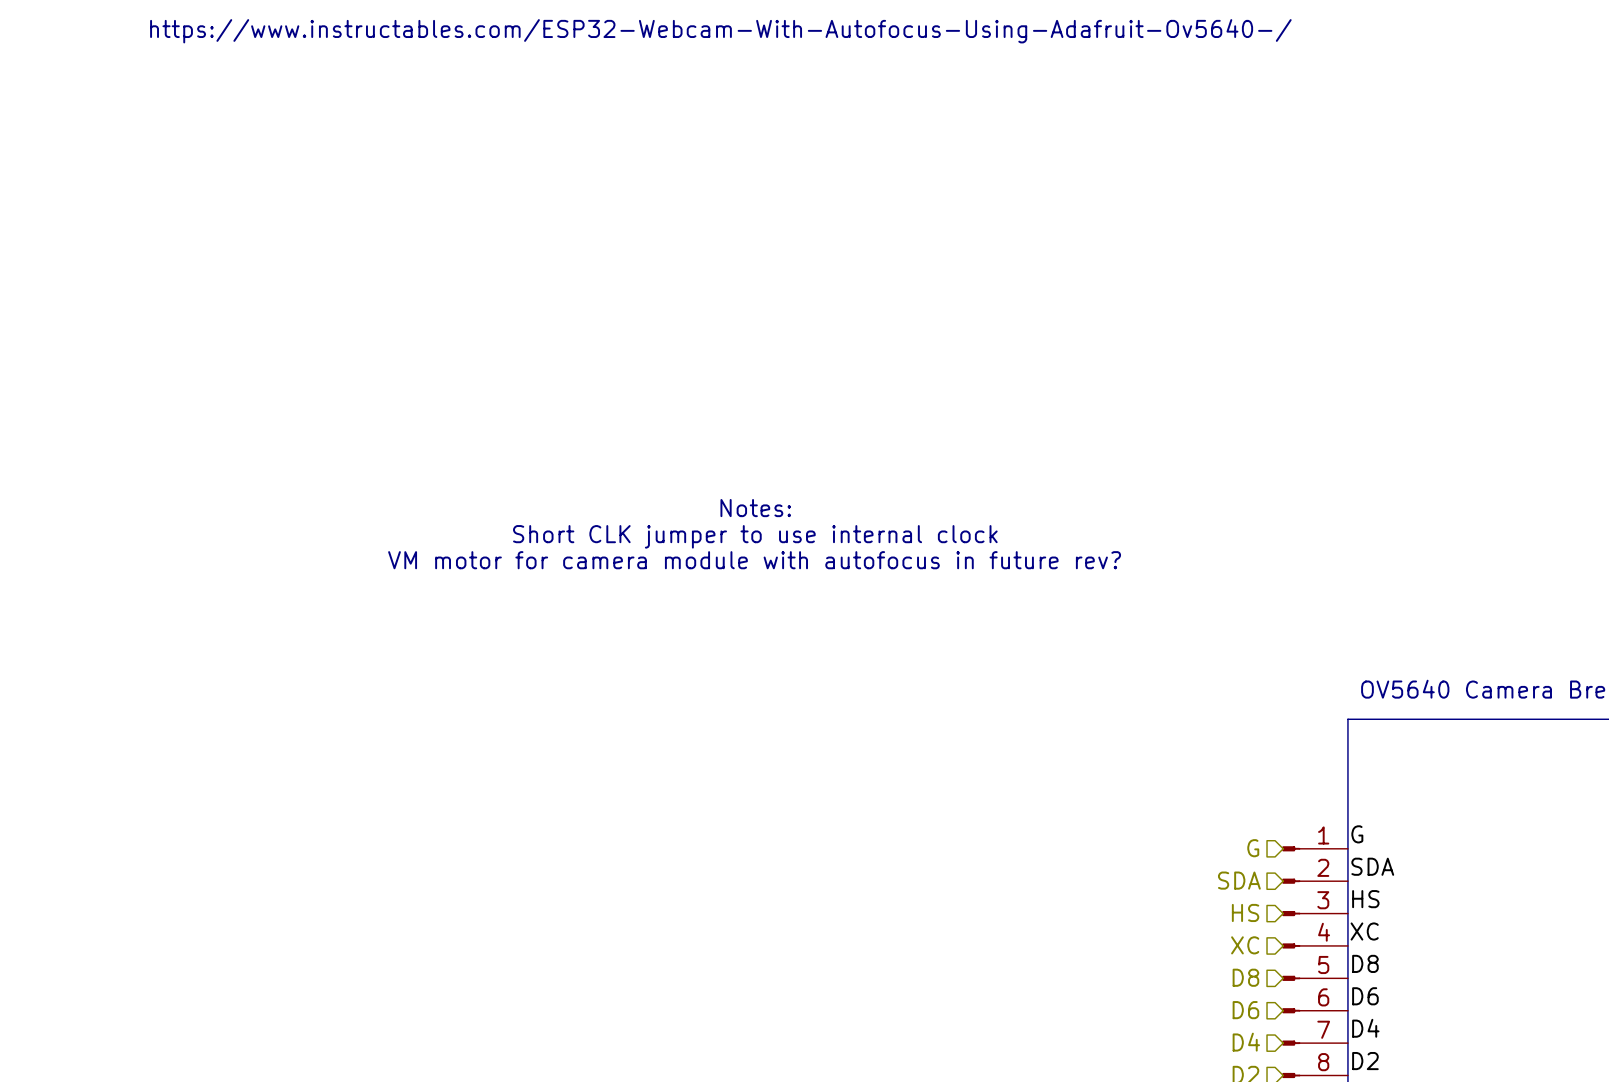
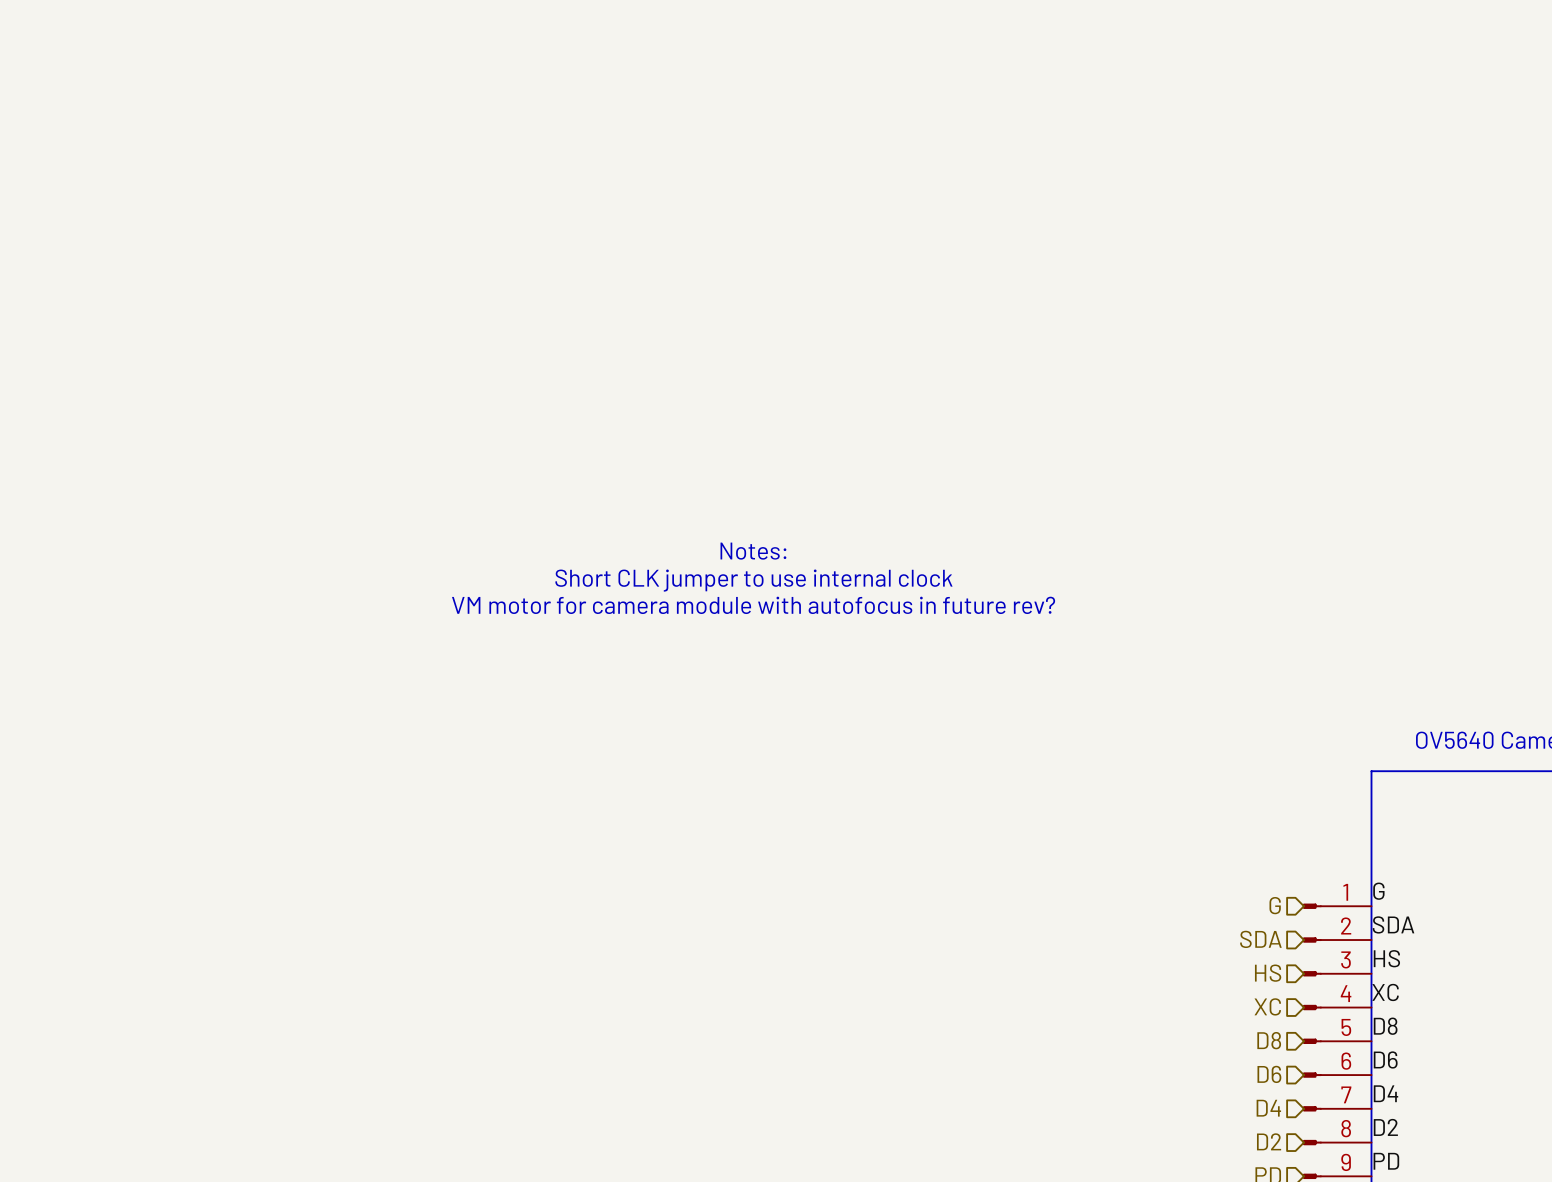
text: https://www.instructables.com/ESP32-Webcam-With-Autofocus-Using-Adafruit-Ov5640-/ (720, 31) -> none

